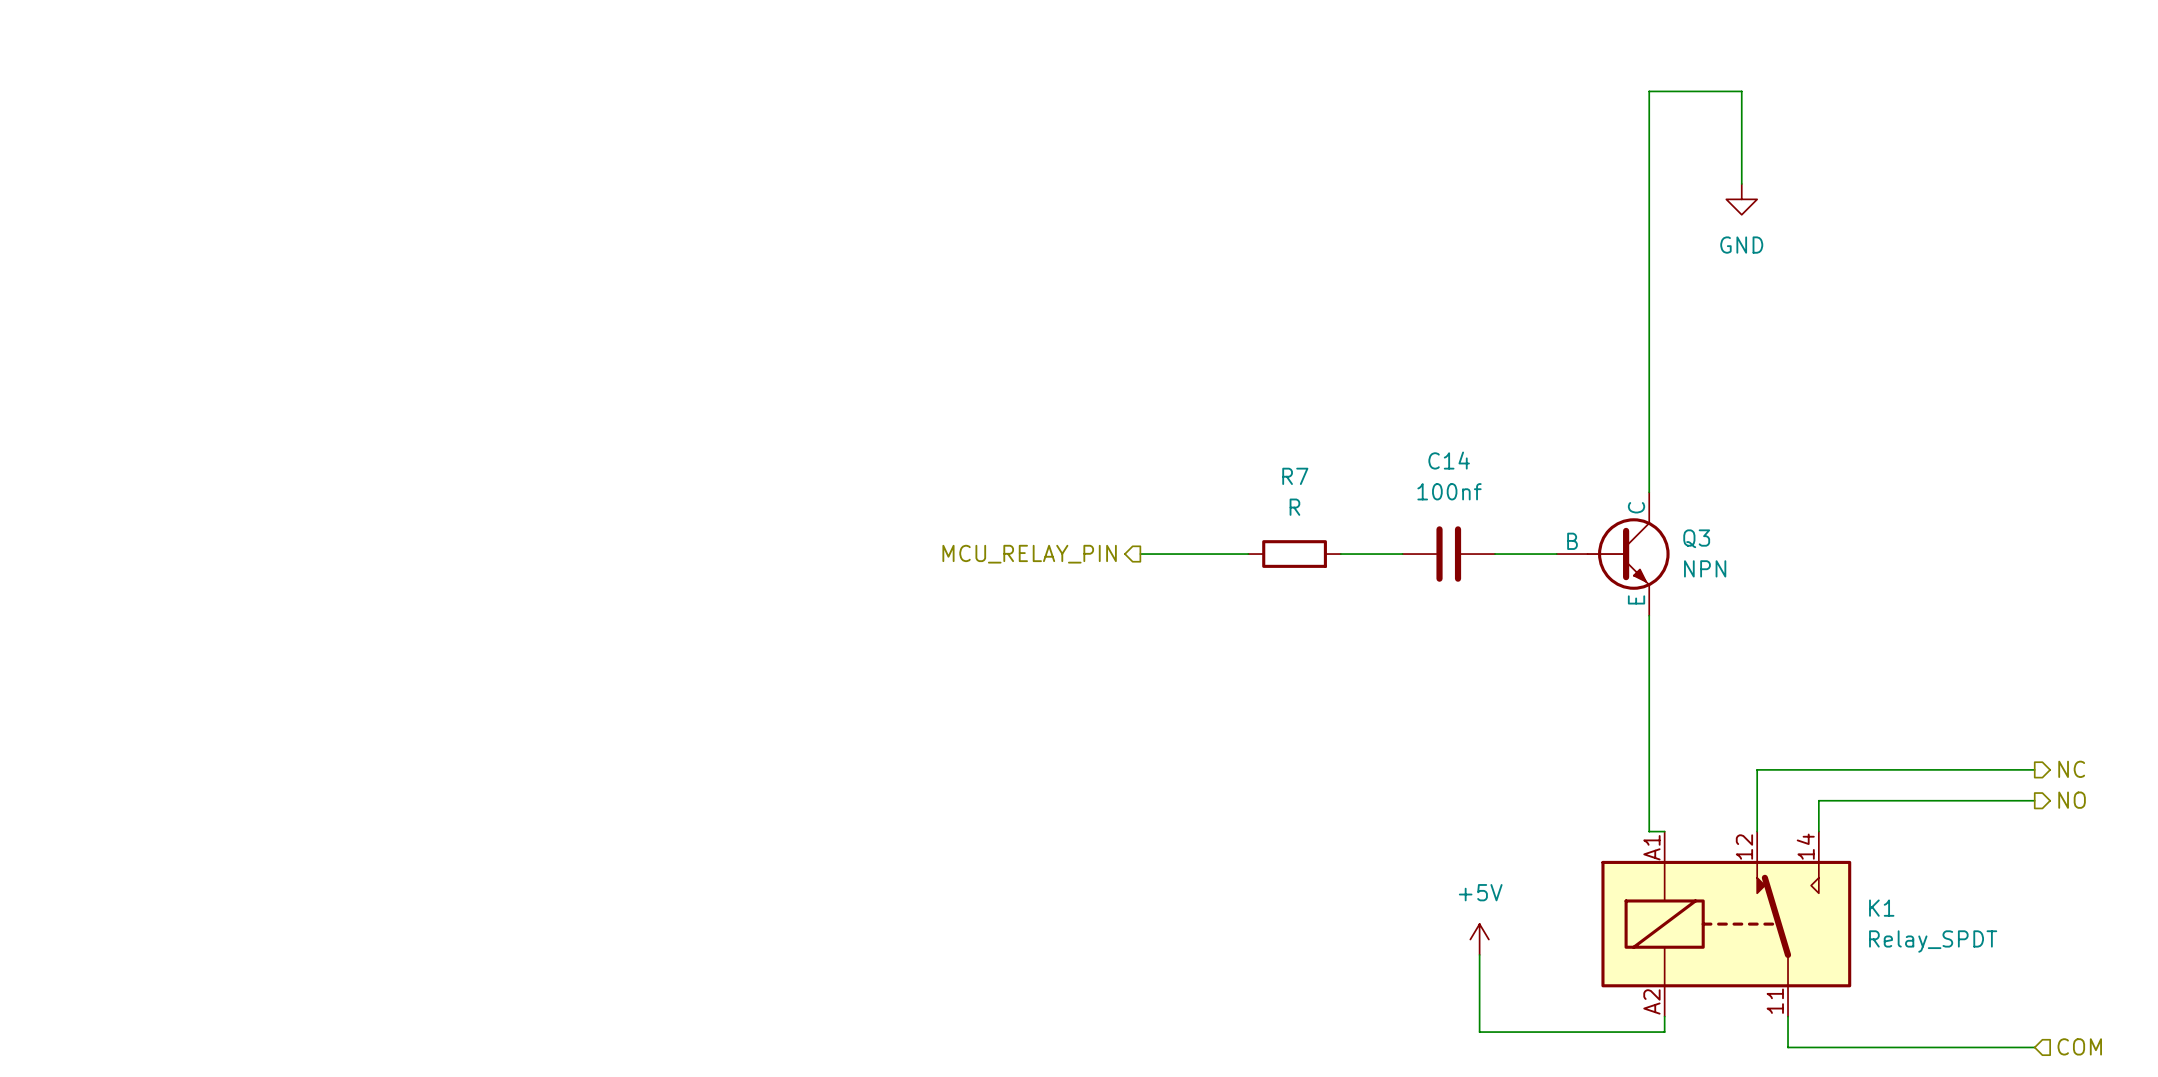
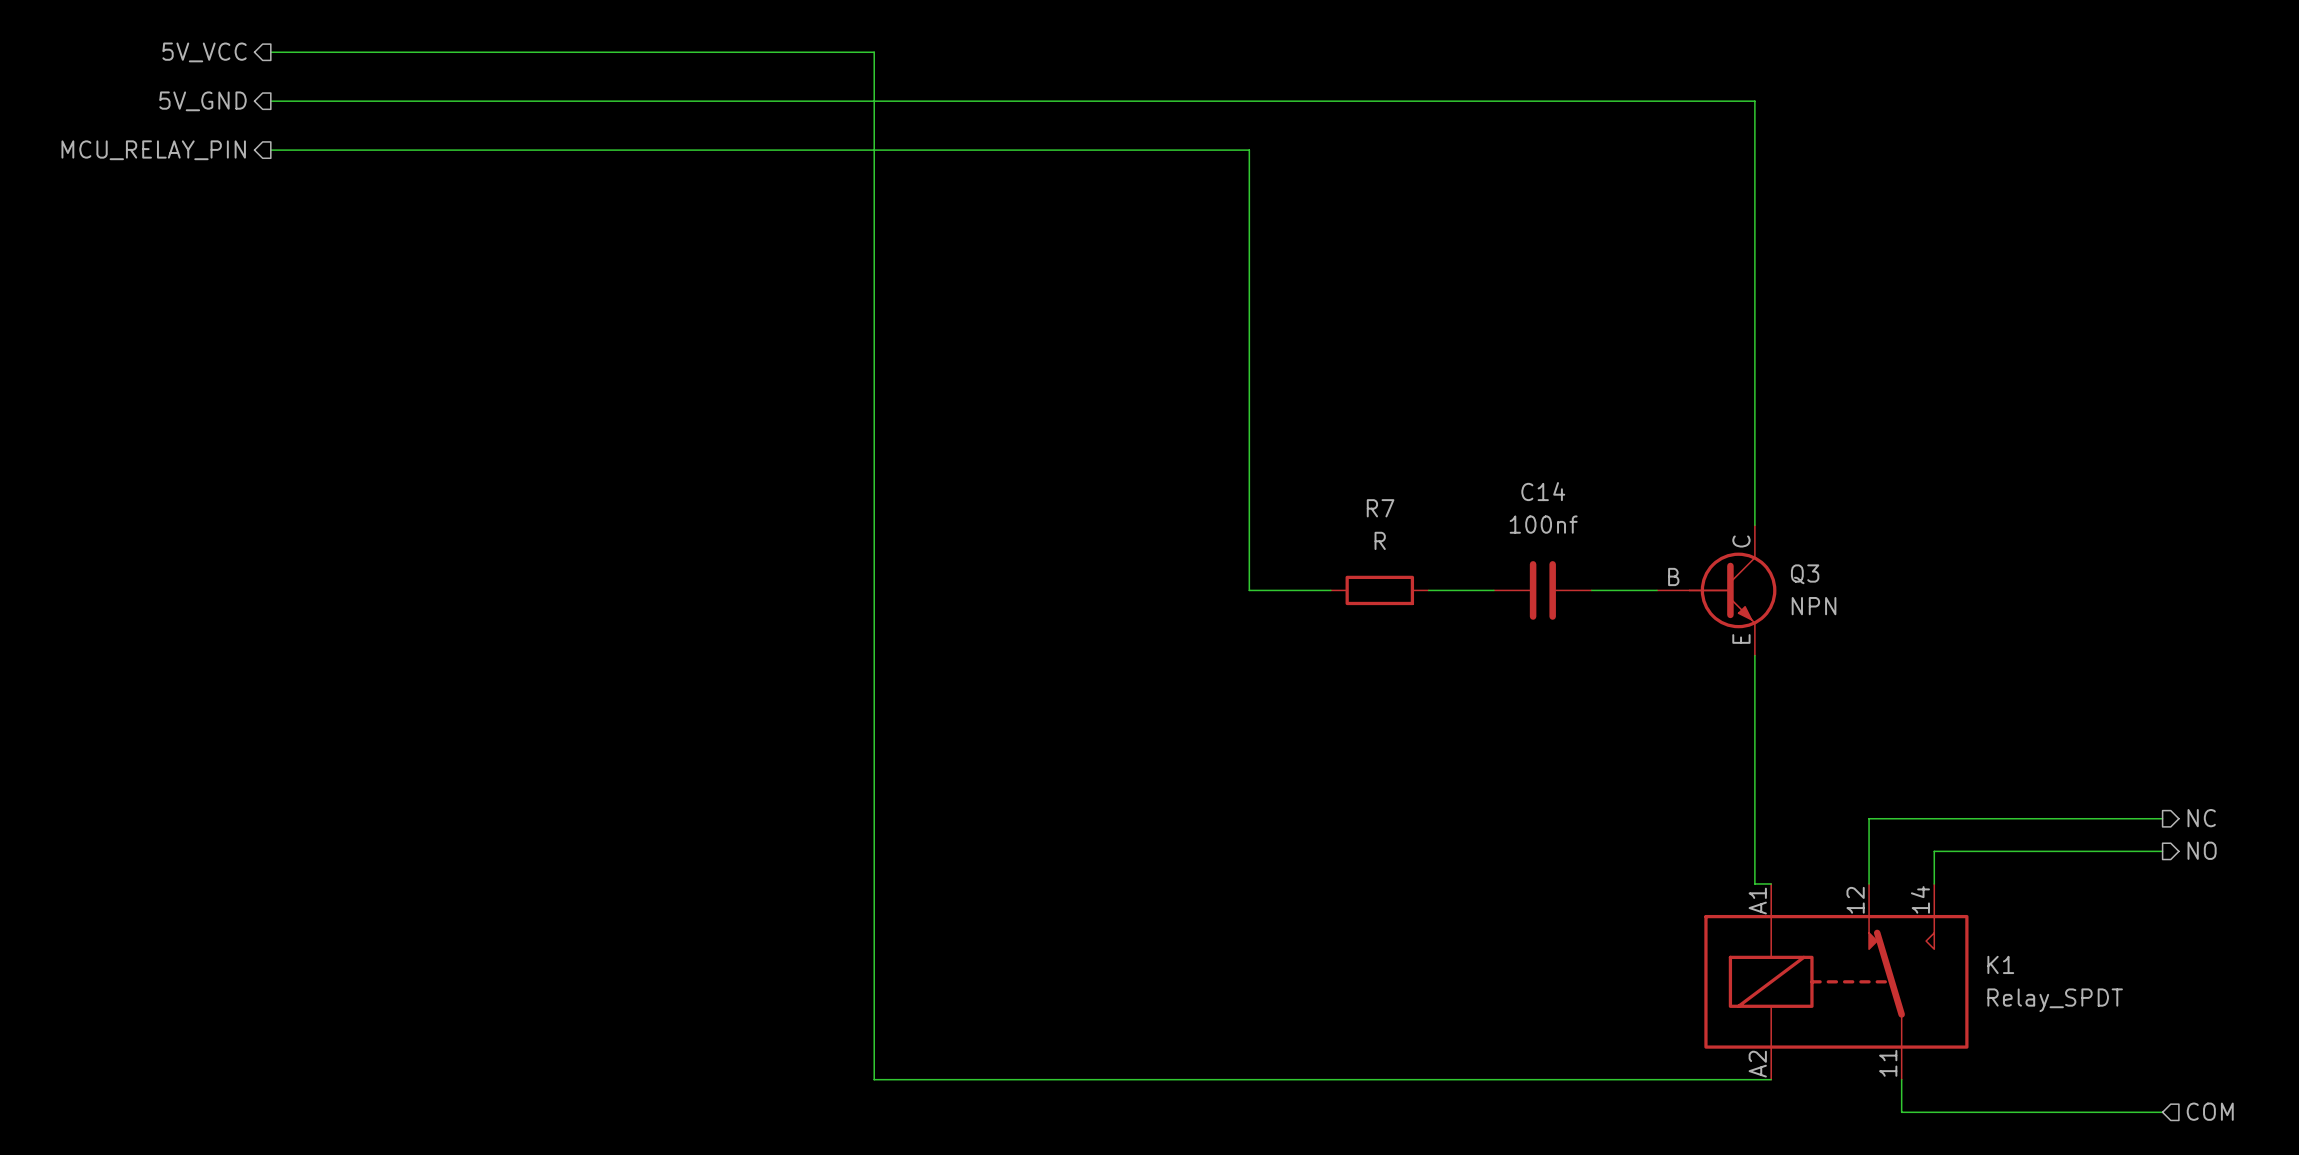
hierarchical label: none -> 5V_VCC (204, 52)
hierarchical label: none -> 5V_GND (203, 101)
wire: (1649, 91) (1741, 91) (1741, 183) -> (1754, 101) (270, 101)
hierarchical label: none -> MCU_RELAY_PIN (153, 150)
power symbol: GND (1741, 199) -> none
hierarchical label: MCU_RELAY_PIN (1029, 554) -> none
wire: (1140, 554) (1171, 554) -> (270, 150) (1249, 150) (1249, 590)
power symbol: +5V (1479, 939) -> none
wire: (1479, 954) (1479, 1032) (1664, 1032) (1664, 1016) -> (270, 52) (874, 52) (874, 1079) (1771, 1079)

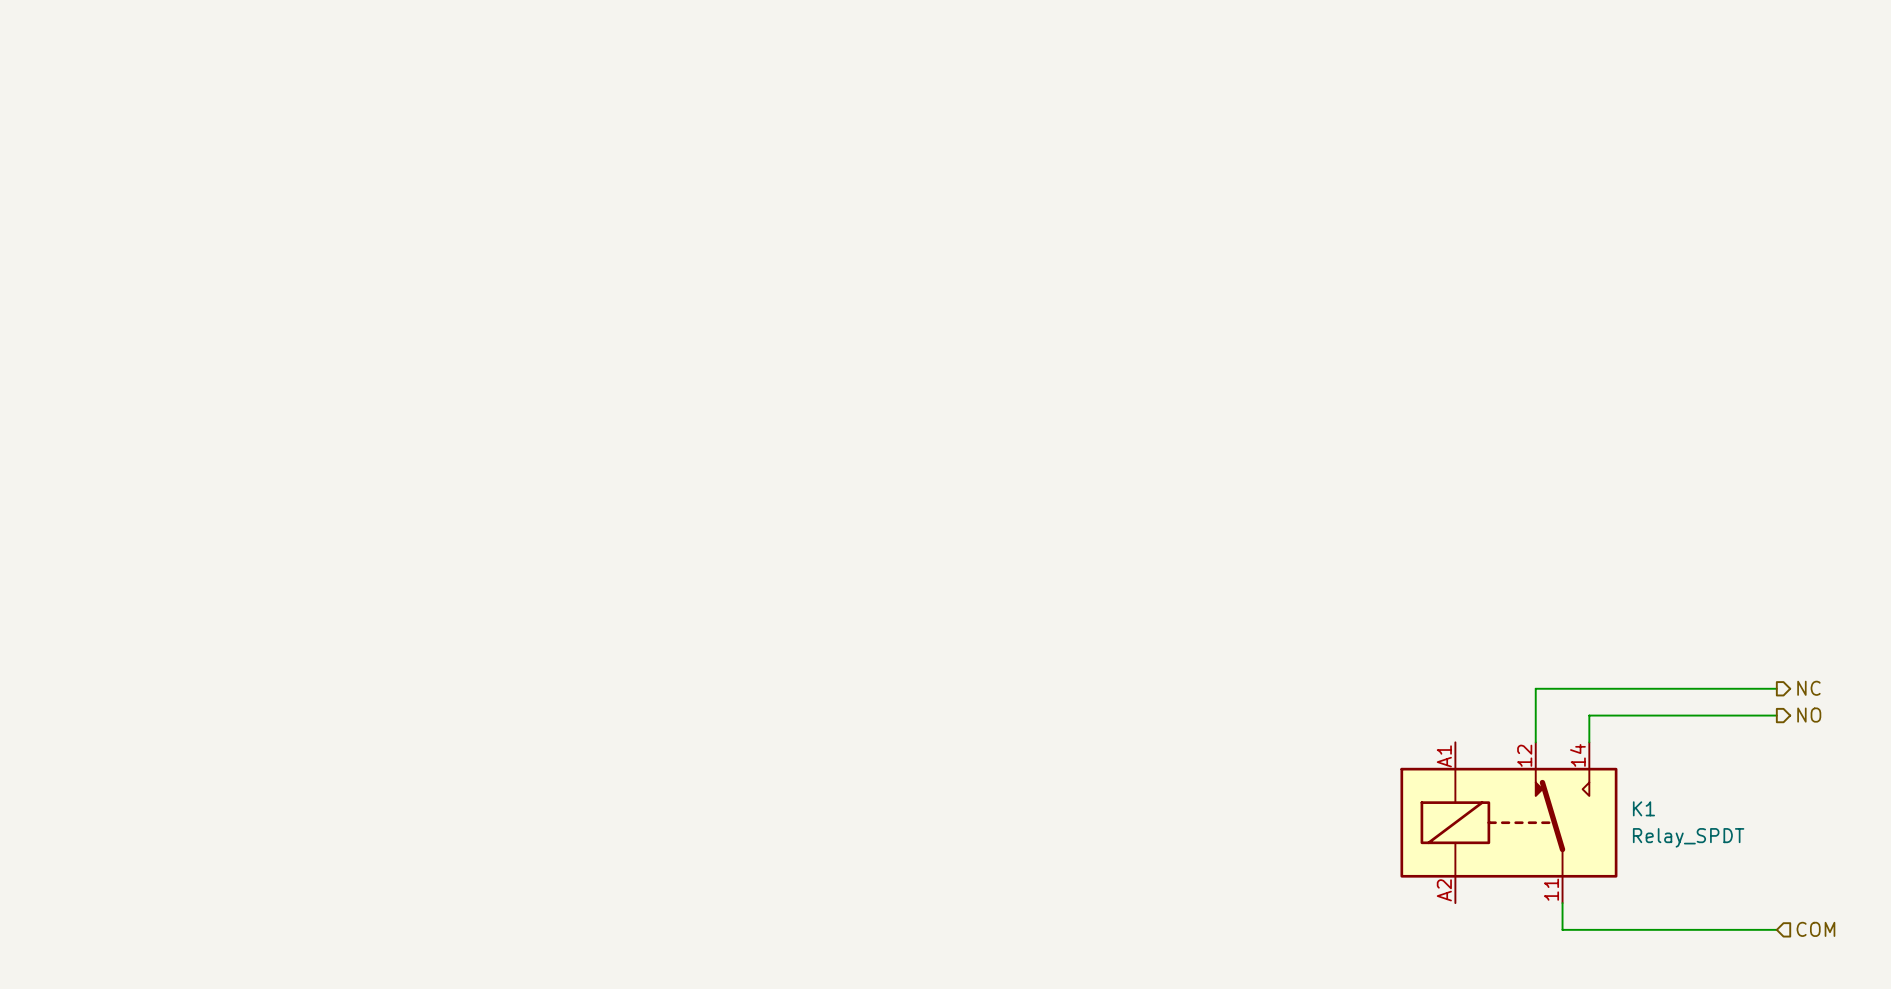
hierarchical label: 5V_VCC (204, 52) -> none
wire: (270, 52) (874, 52) (874, 1079) (1771, 1079) -> none
hierarchical label: 5V_GND (203, 101) -> none
wire: (270, 101) (1754, 101) (1754, 525) -> none
hierarchical label: MCU_RELAY_PIN (153, 150) -> none
wire: (270, 150) (1249, 150) (1249, 590) (1330, 590) -> none
R7: R (1379, 590) -> none
wire: (1428, 590) (1493, 590) -> none
C14: 100nf (1542, 590) -> none
wire: (1591, 590) (1657, 590) -> none
Q3: NPN (1716, 590) -> none
wire: (1754, 655) (1754, 883) (1771, 883) -> none

